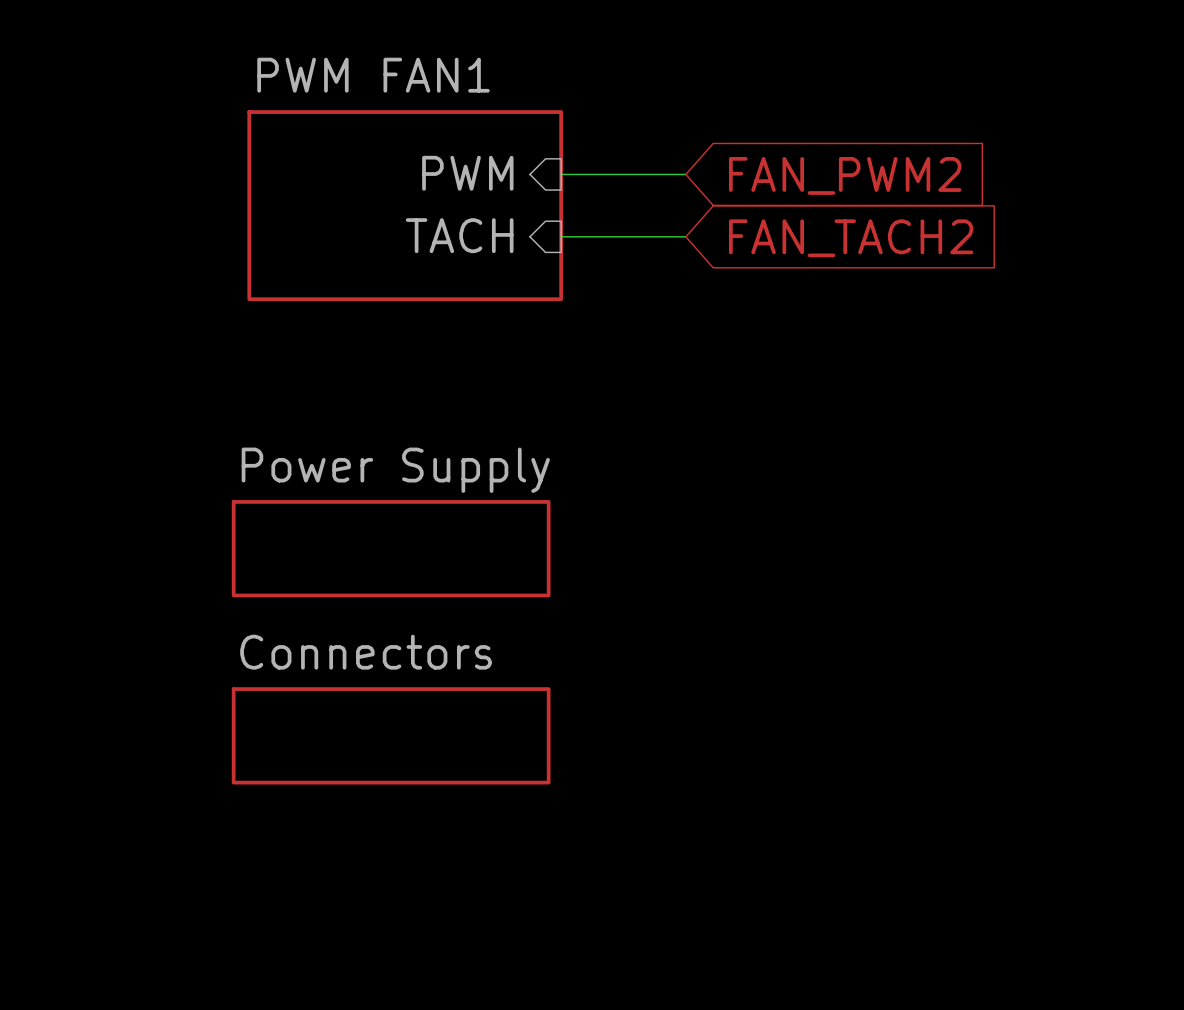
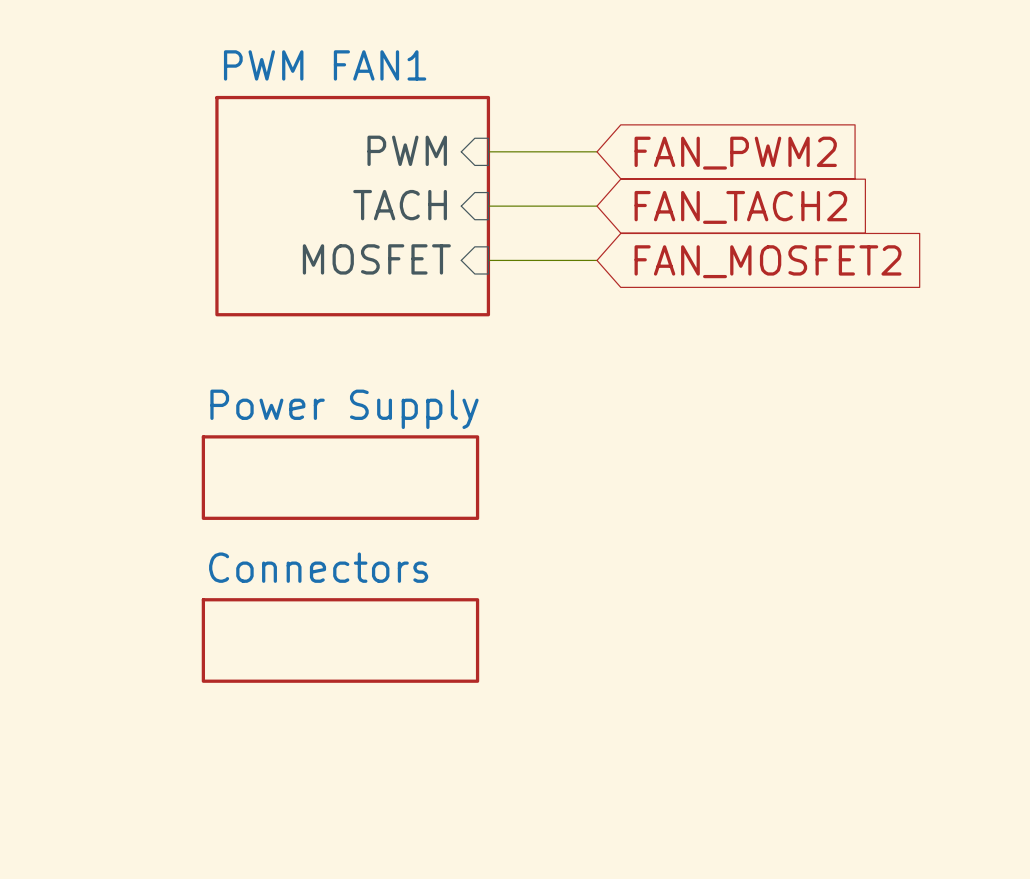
sheet PWM FAN1 shape: [247, 110, 564, 302] -> [215, 95, 491, 317]
sheet pin: none -> MOSFET (376, 259)
wire: none -> (488, 260) (597, 260)
global label: none -> FAN_MOSFET2 (768, 261)

